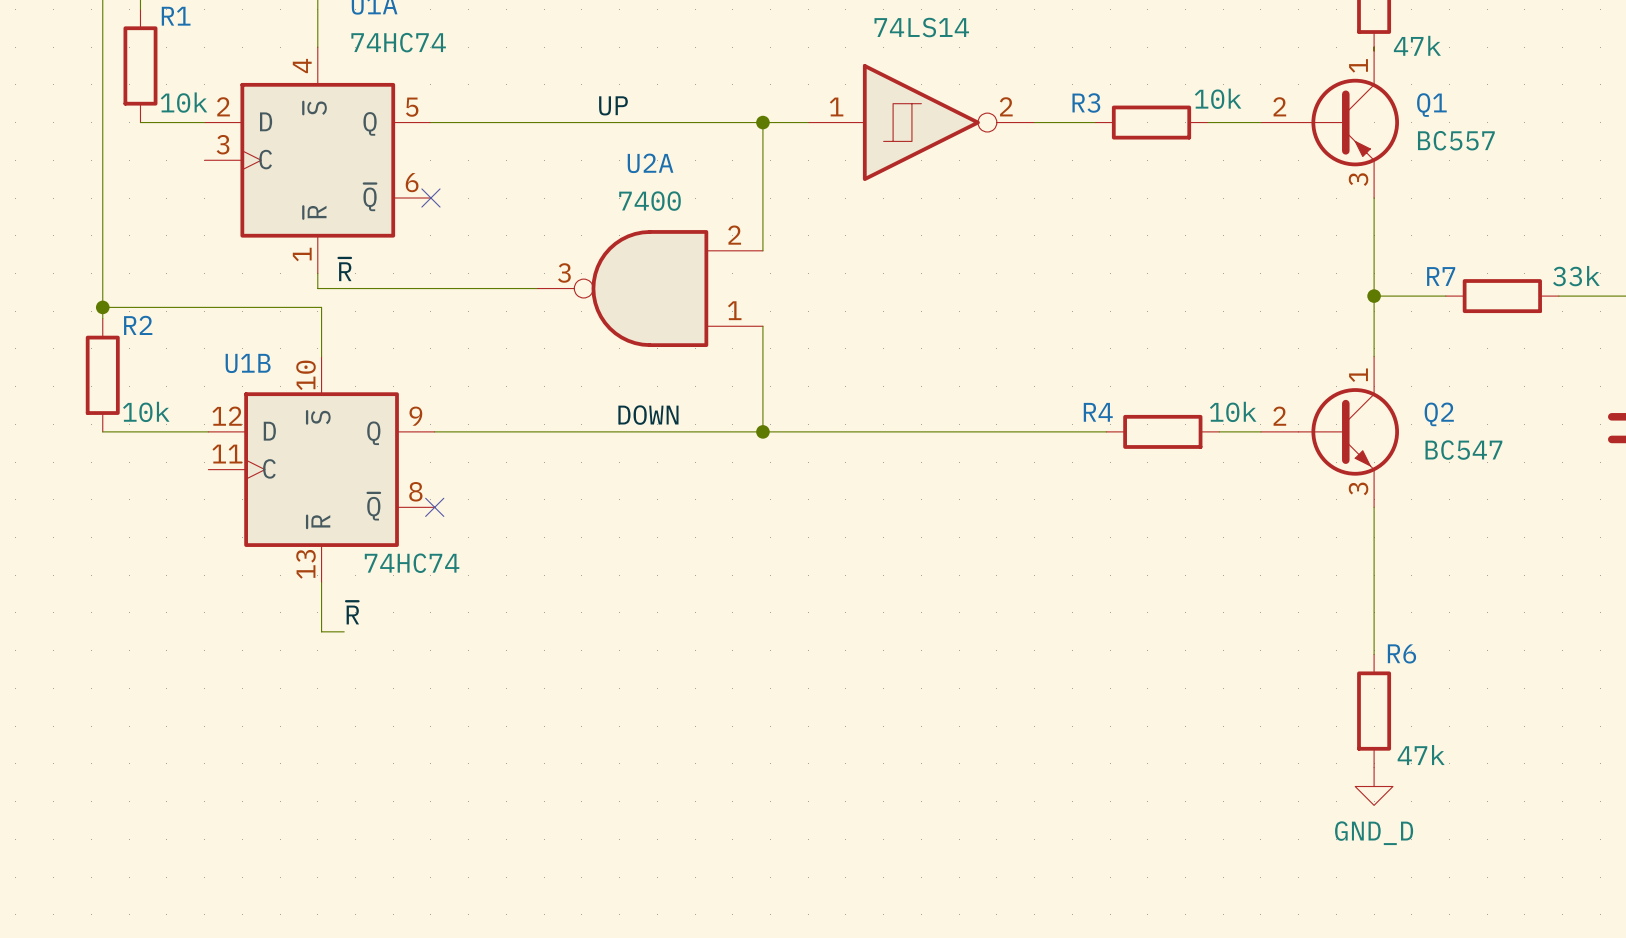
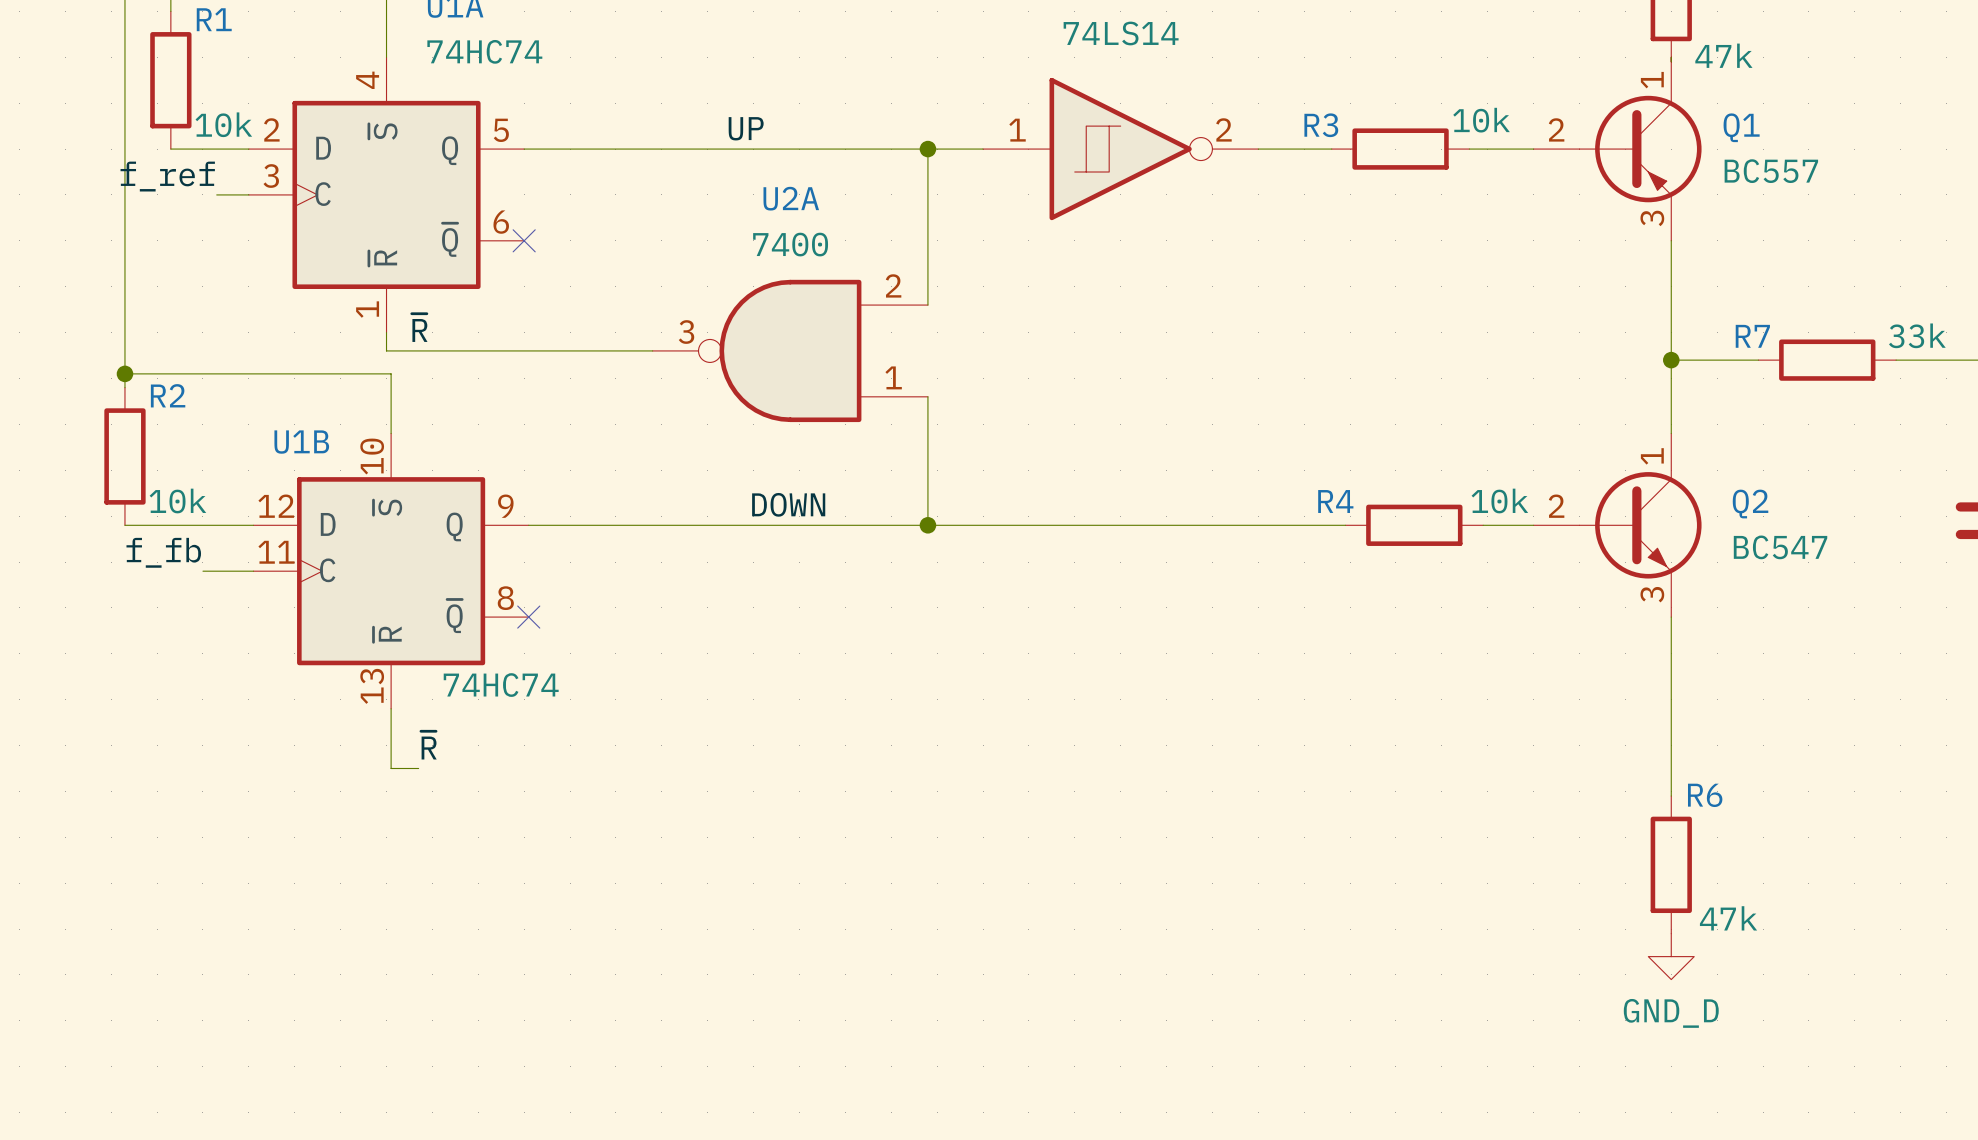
label: none -> f_ref (167, 176)
wire: none -> (216, 194) (248, 194)
label: none -> f_fb (163, 552)
wire: none -> (202, 571) (253, 571)

